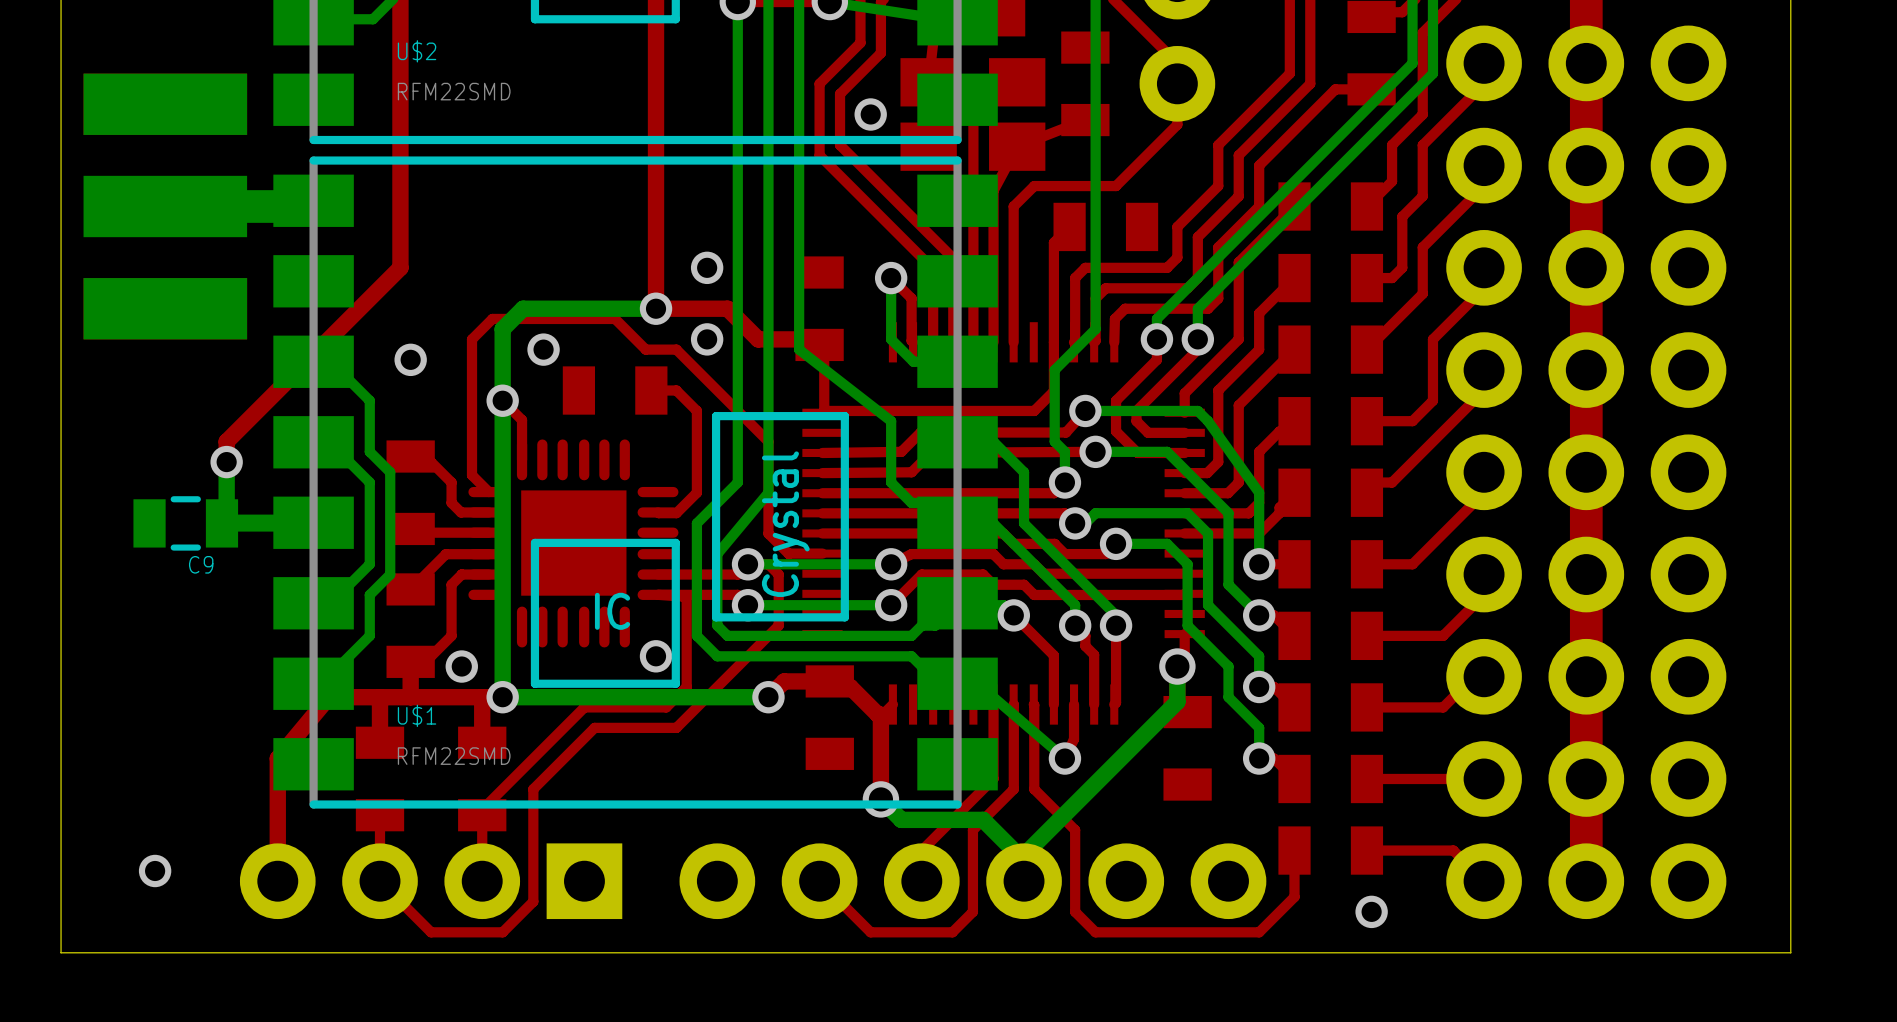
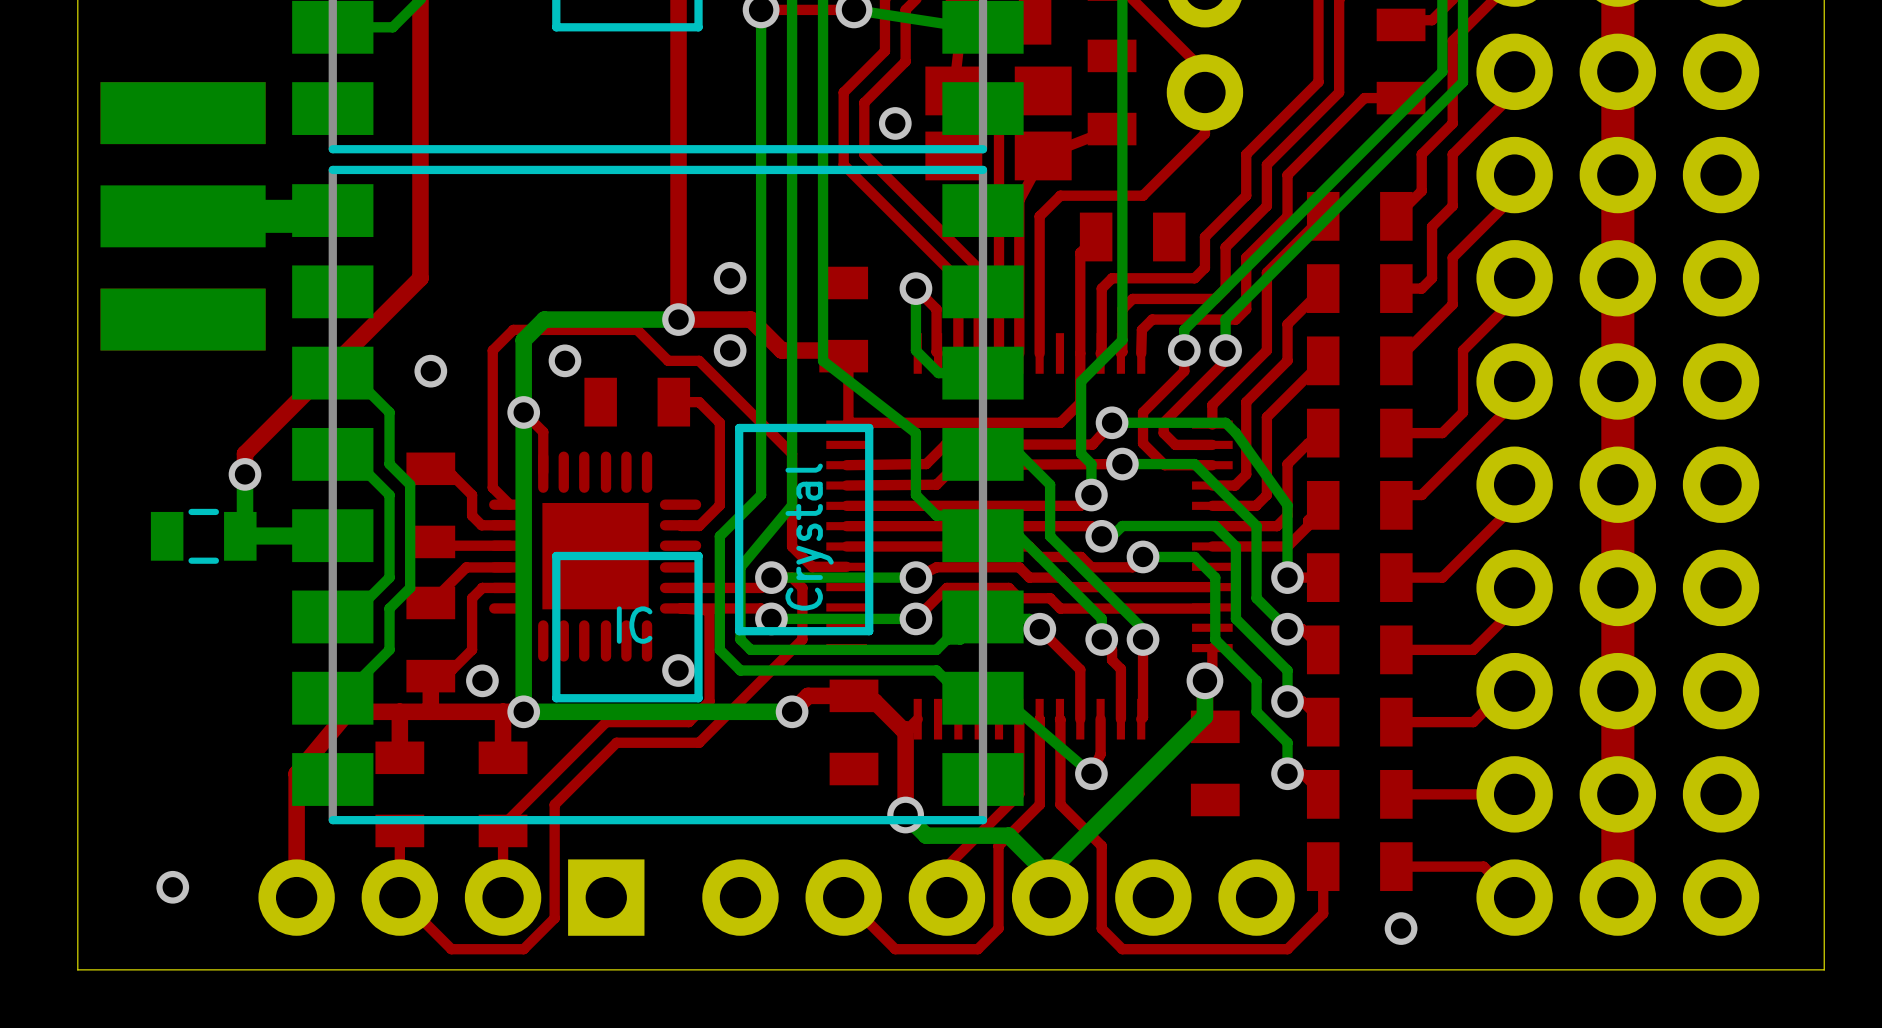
U$2 name: U$2 (417, 51) -> none
U$2 value: RFM22SMD (454, 91) -> none
C9 name: C9 (201, 564) -> none
U$1 name: U$1 (417, 715) -> none
U$1 value: RFM22SMD (454, 756) -> none

